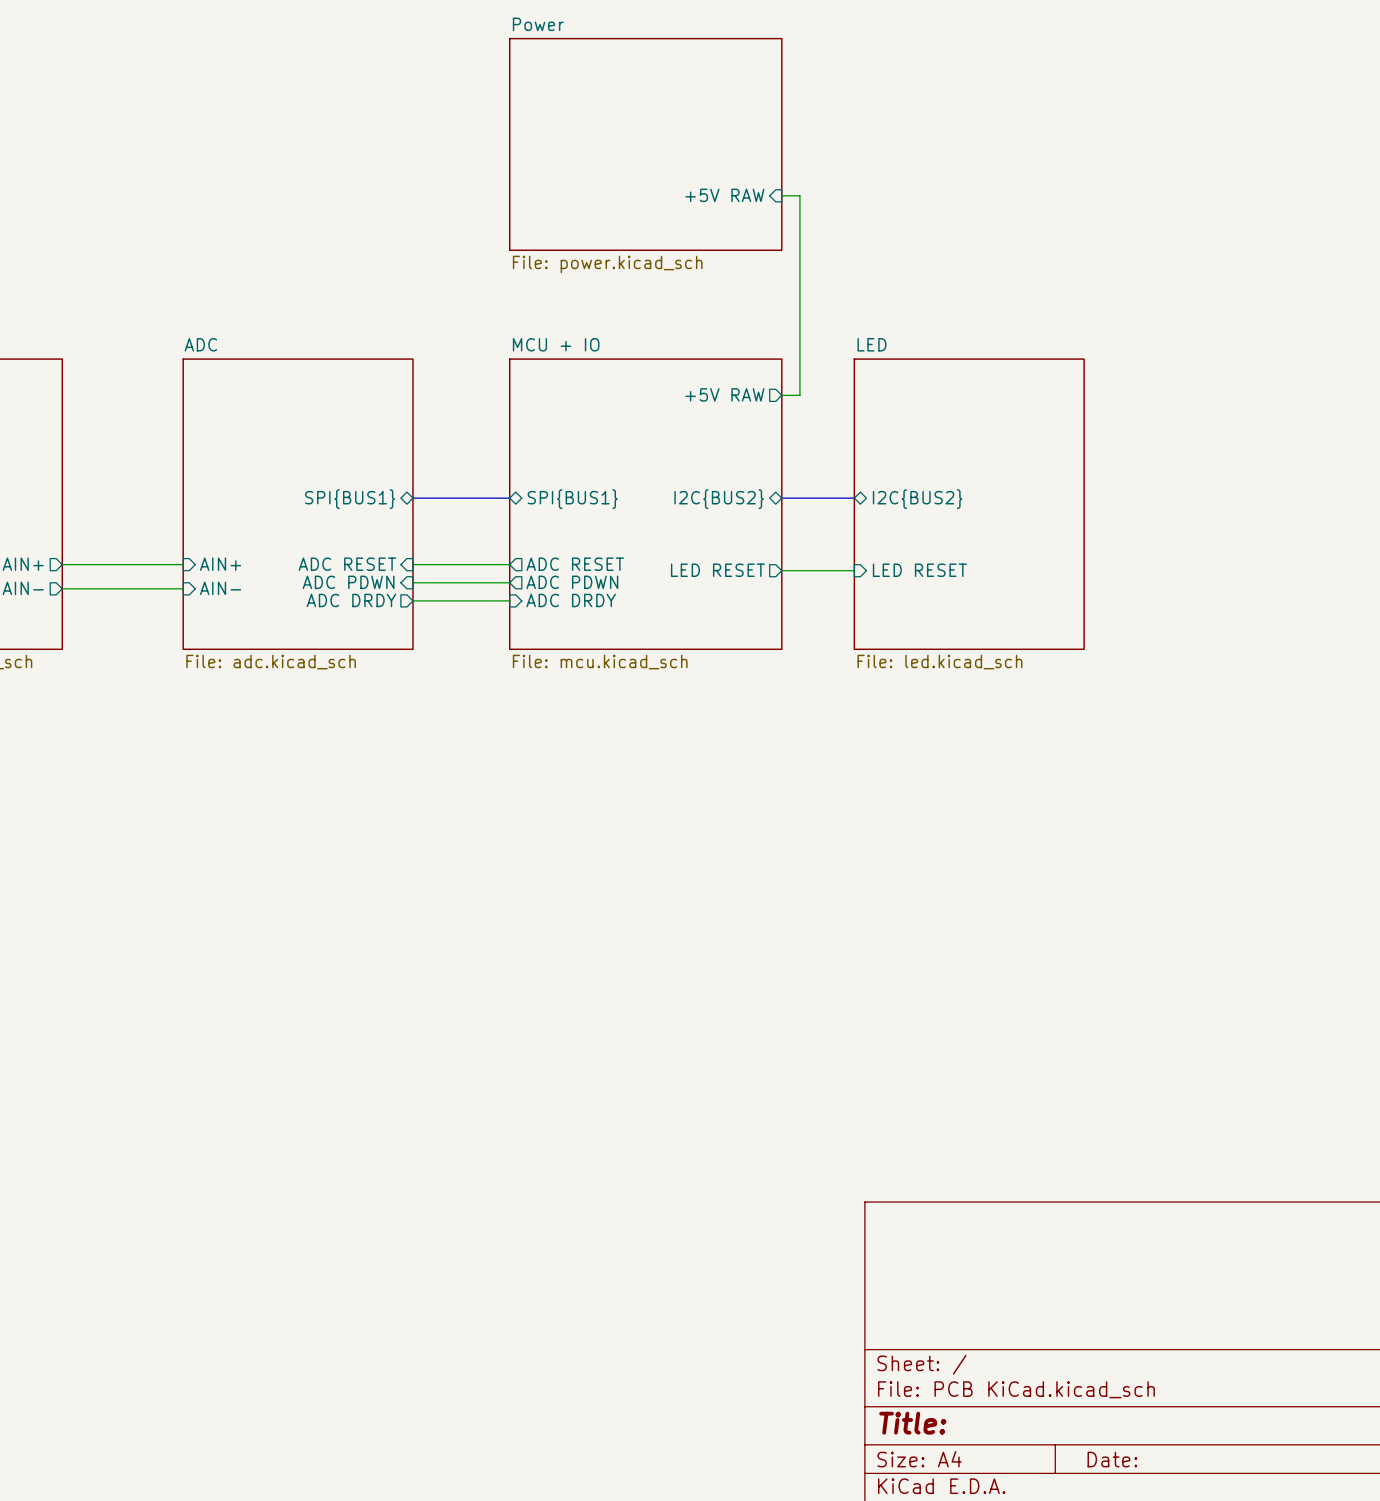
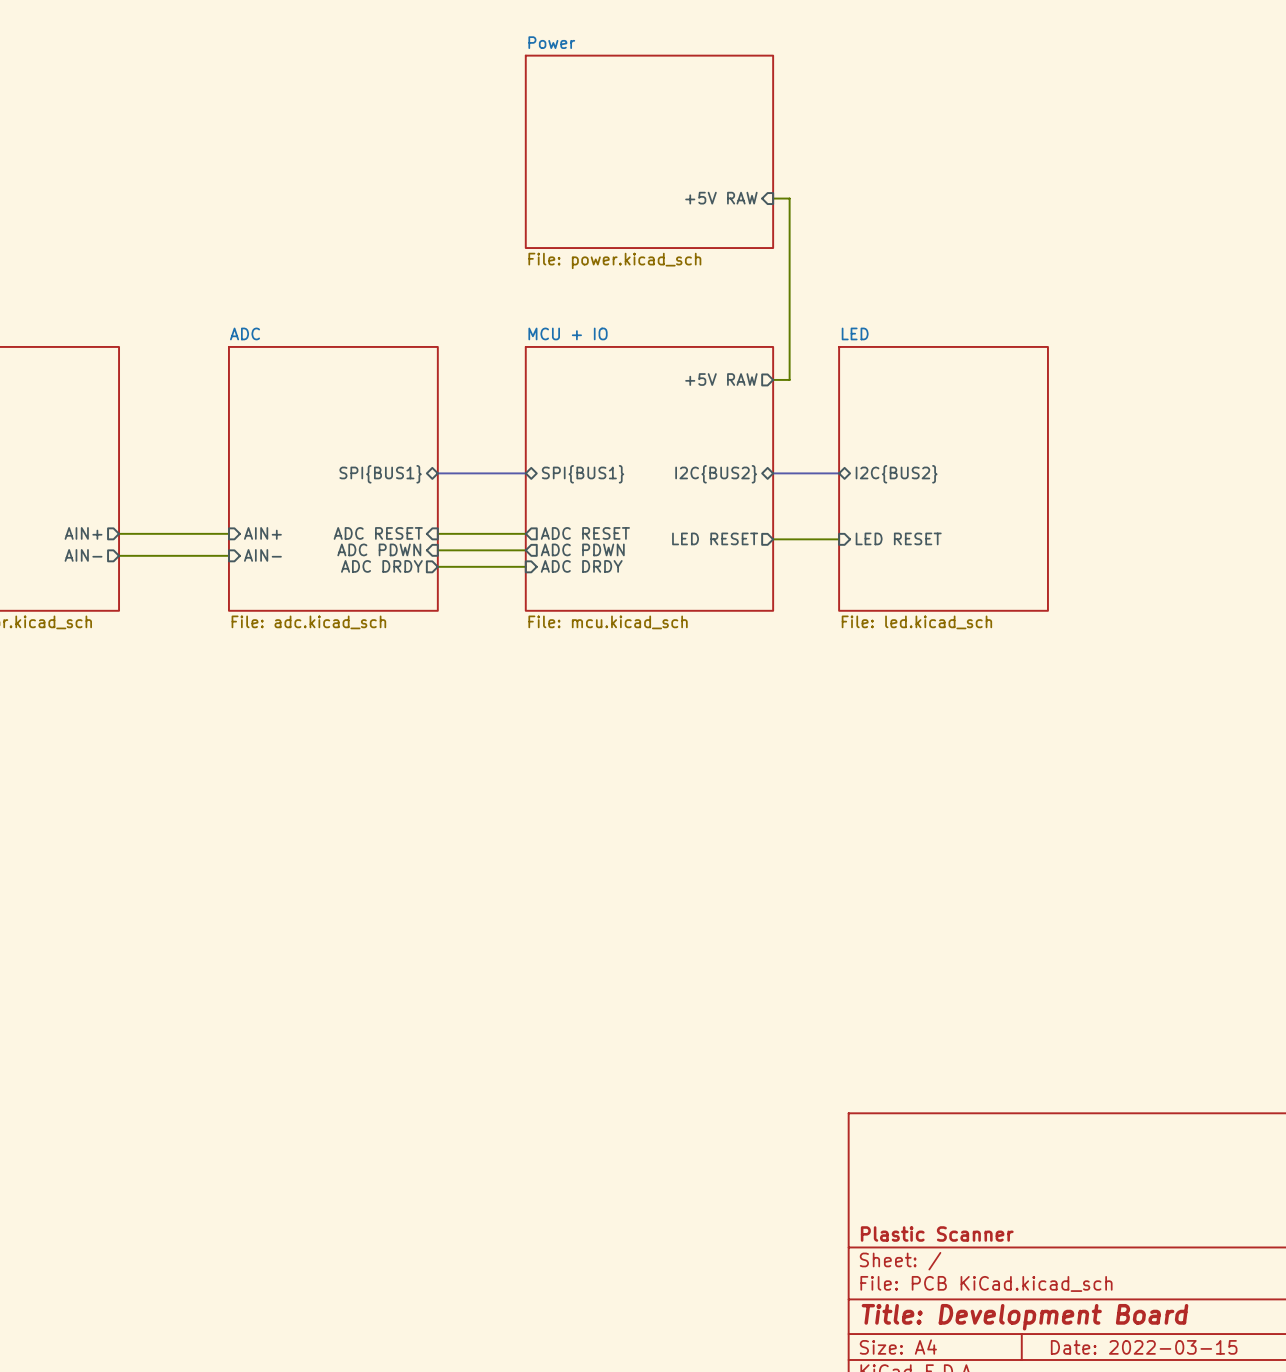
title block: none -> Plastic Scanner (937, 1233)
title block: Title: (912, 1423) -> Title: Development Board (1024, 1317)
title block: Date: (1112, 1459) -> Date: 2022-03-15 (1144, 1347)

